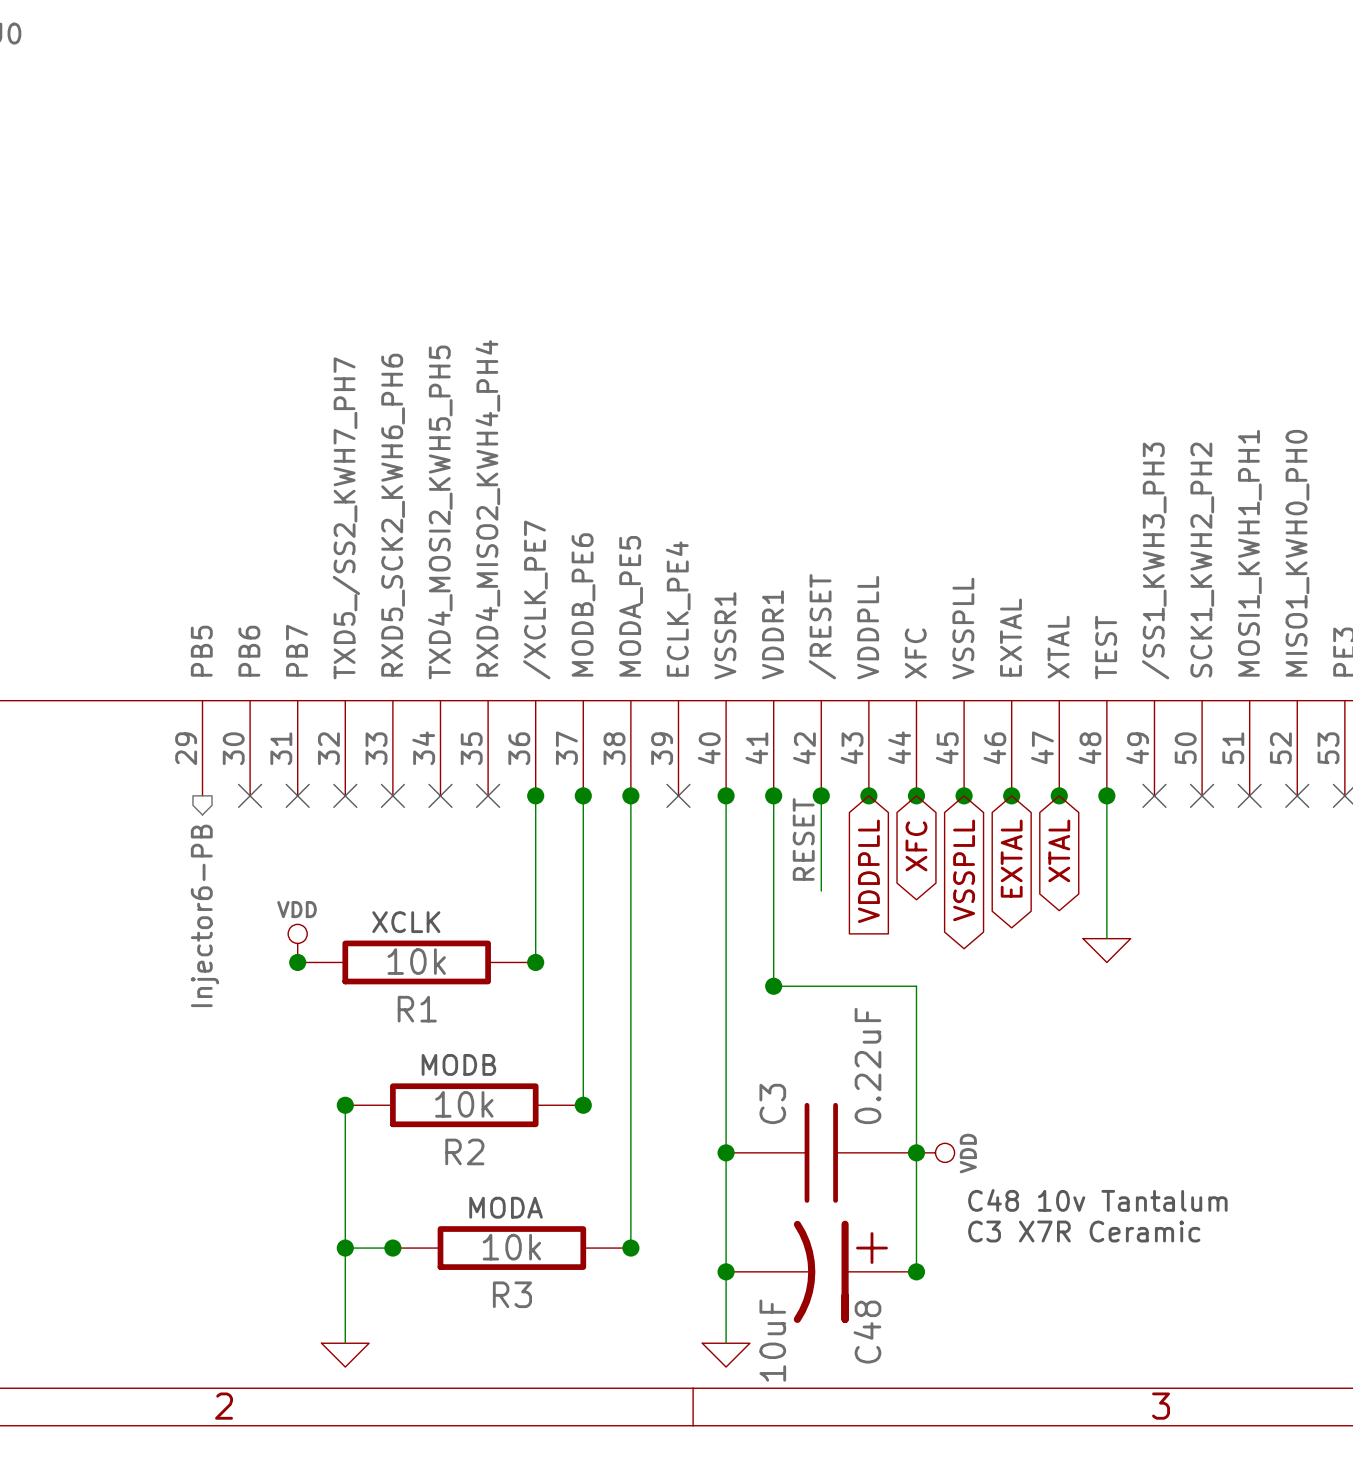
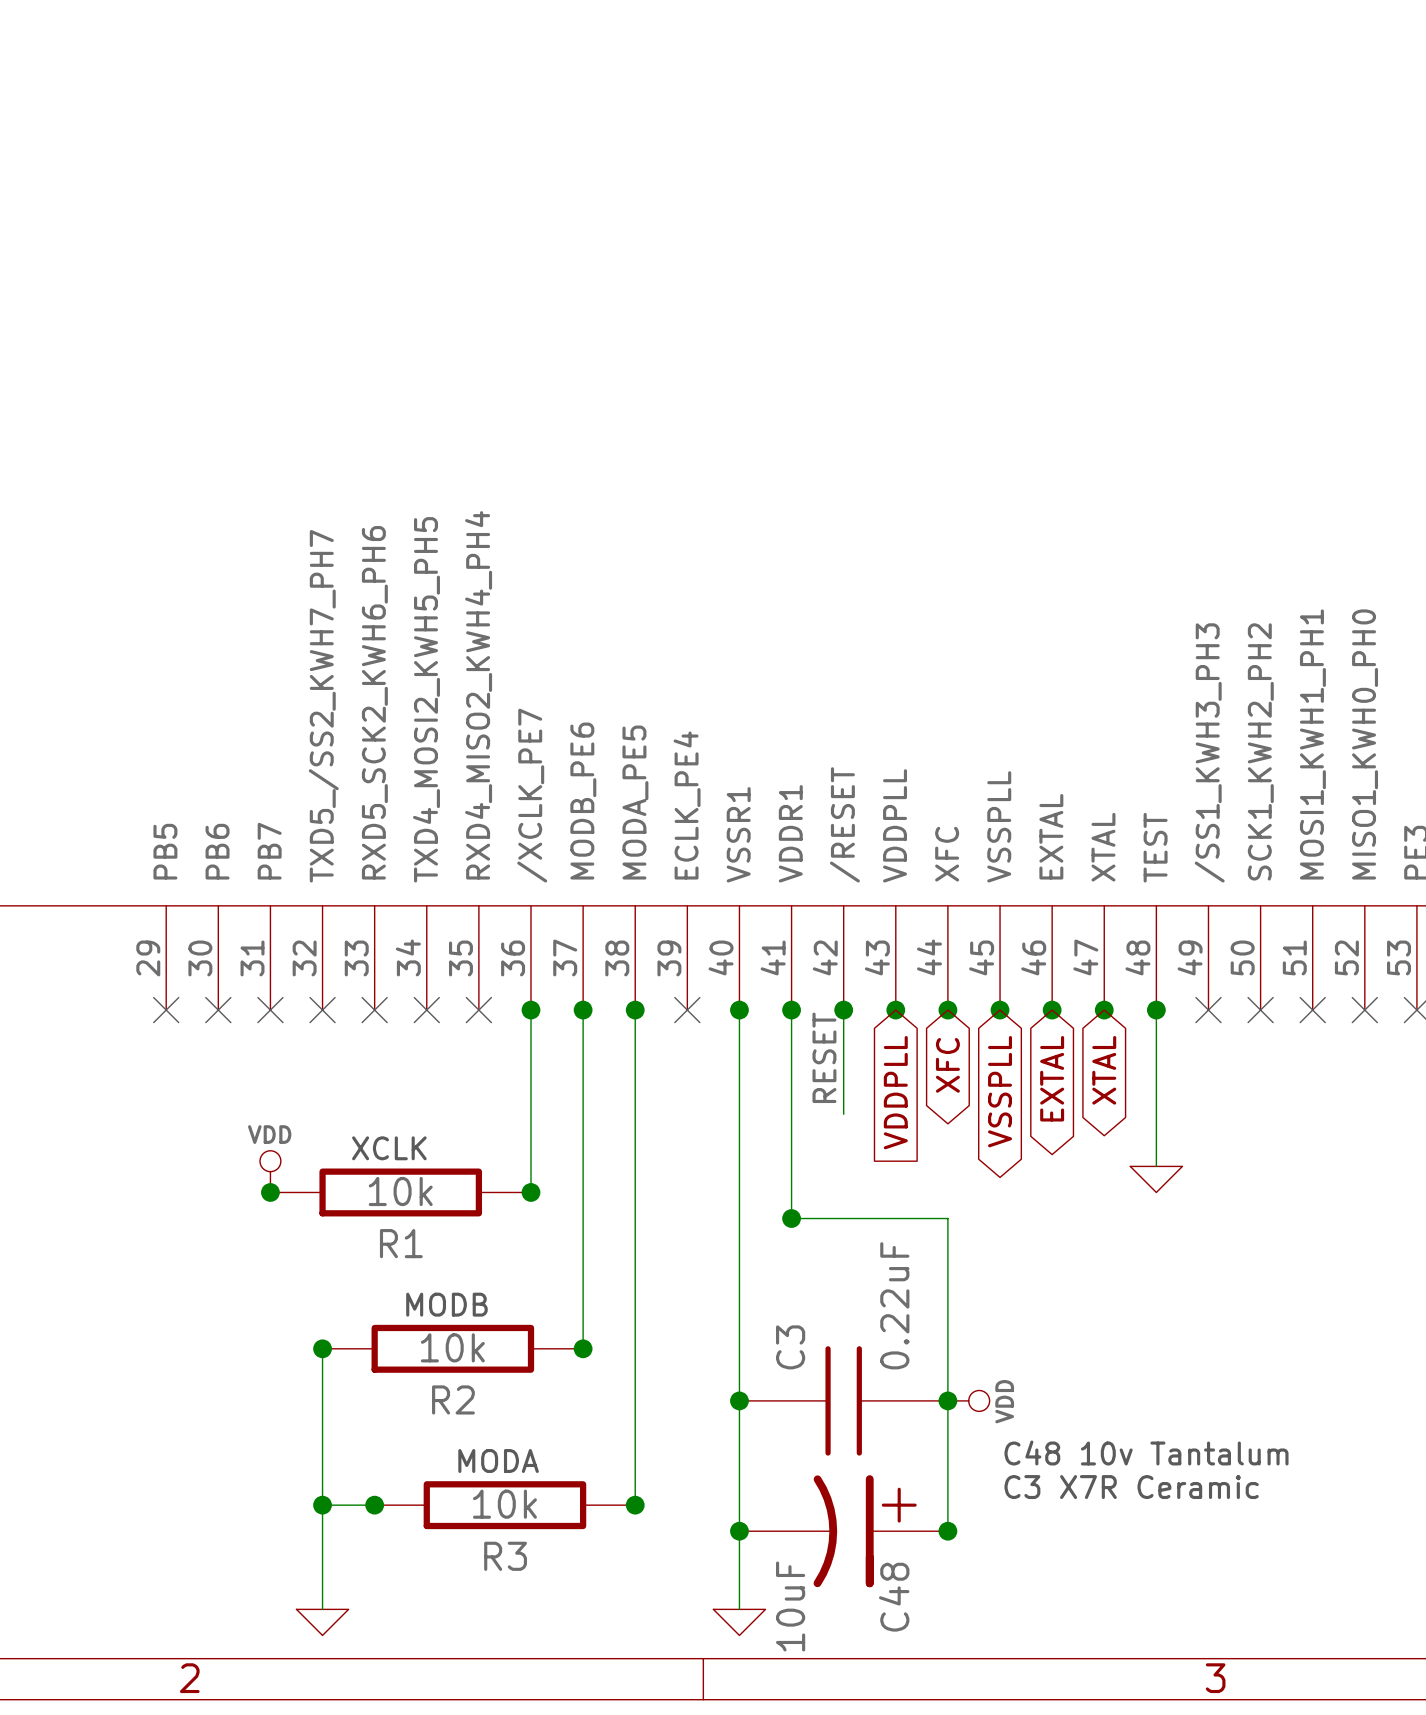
no-connect mark: none -> (166, 1010)
hierarchical label: Injector6-PB (204, 915) -> none

